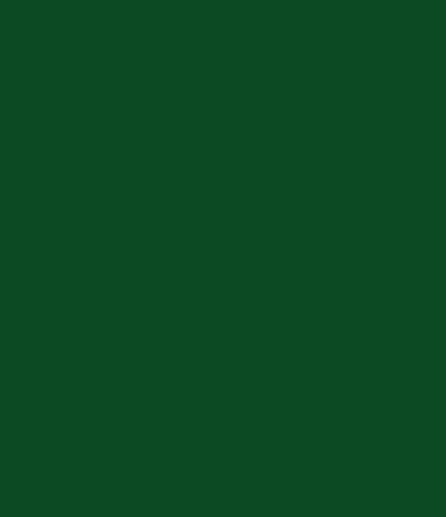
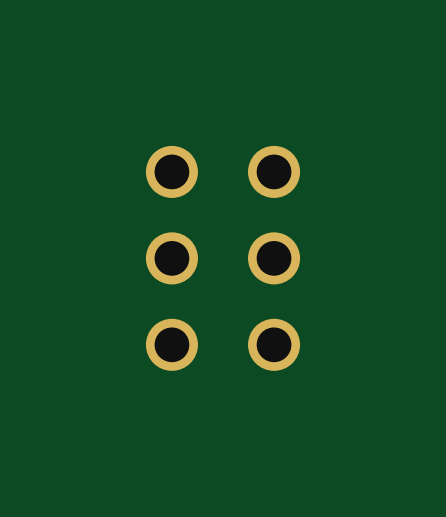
part: none -> (171, 258)
part: none -> (274, 258)

